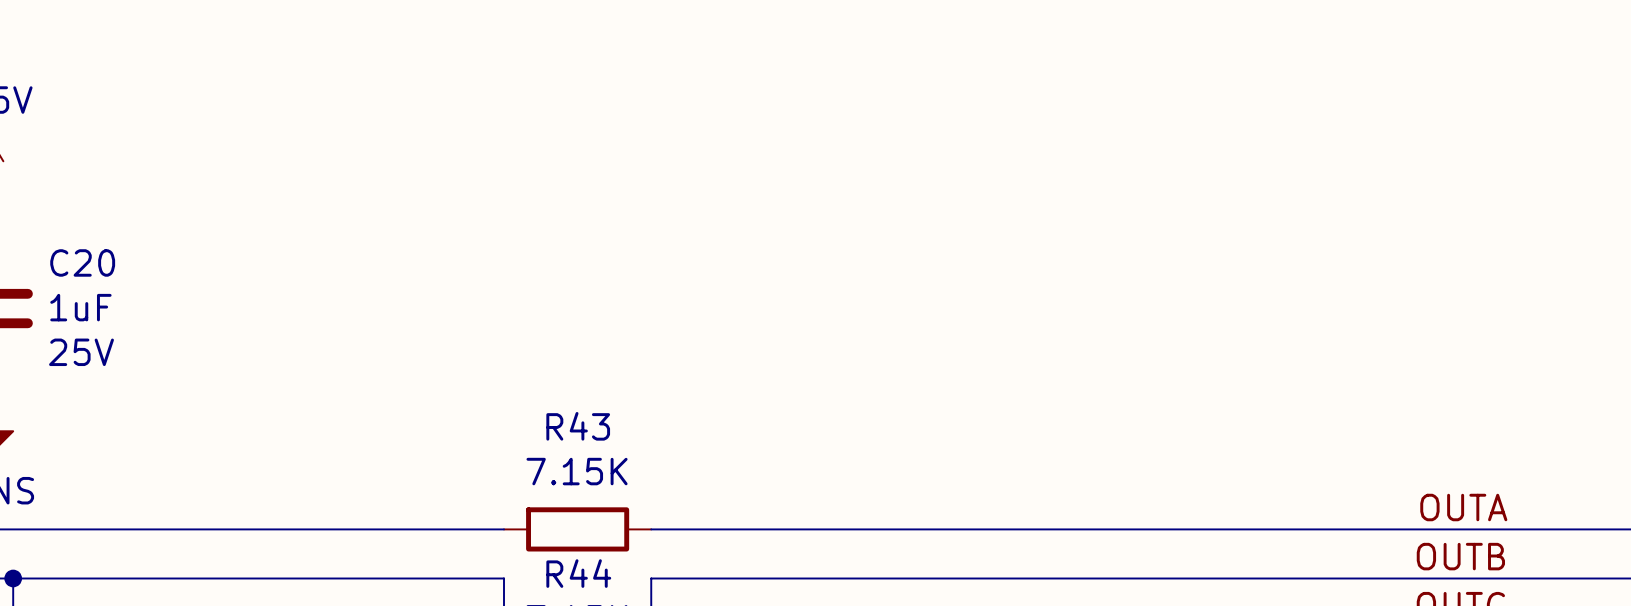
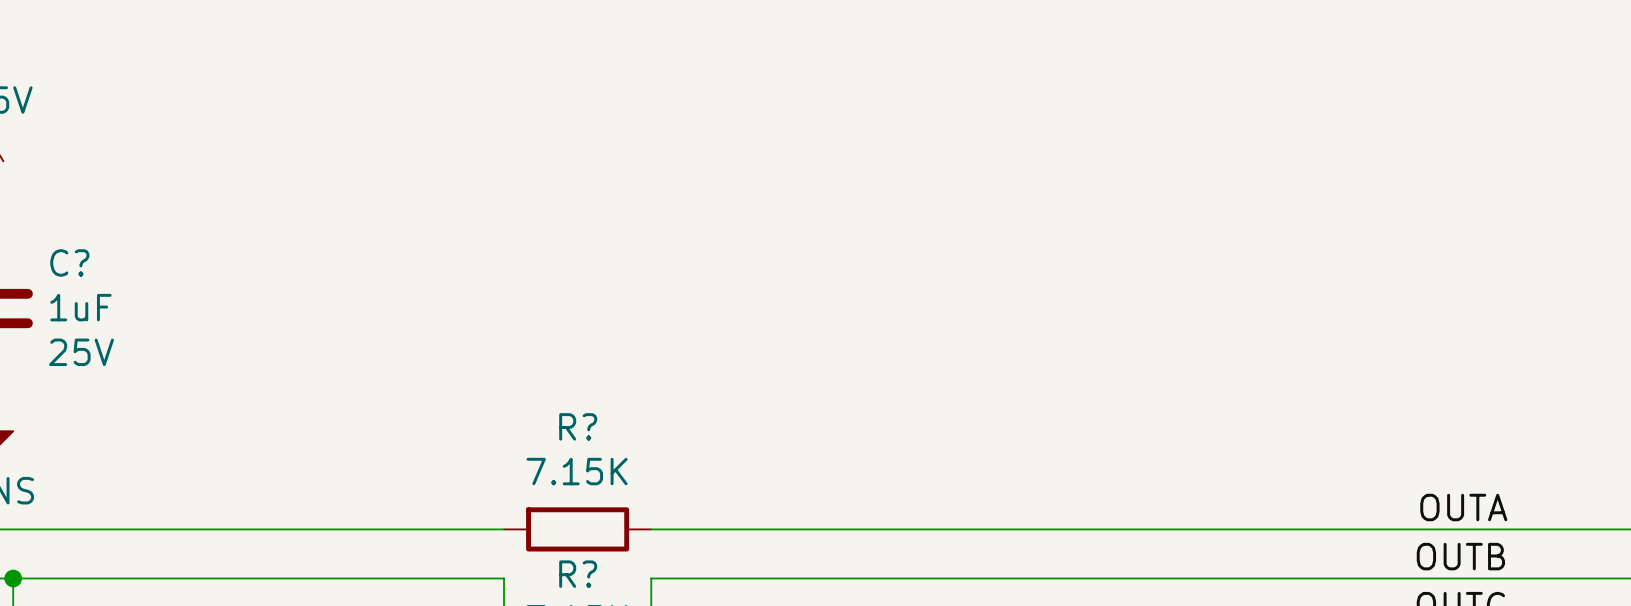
C20 name: C20 (82, 262) -> C? (69, 262)
R43 name: R43 (578, 426) -> R? (578, 426)
R44 name: R44 (578, 573) -> R? (578, 574)

